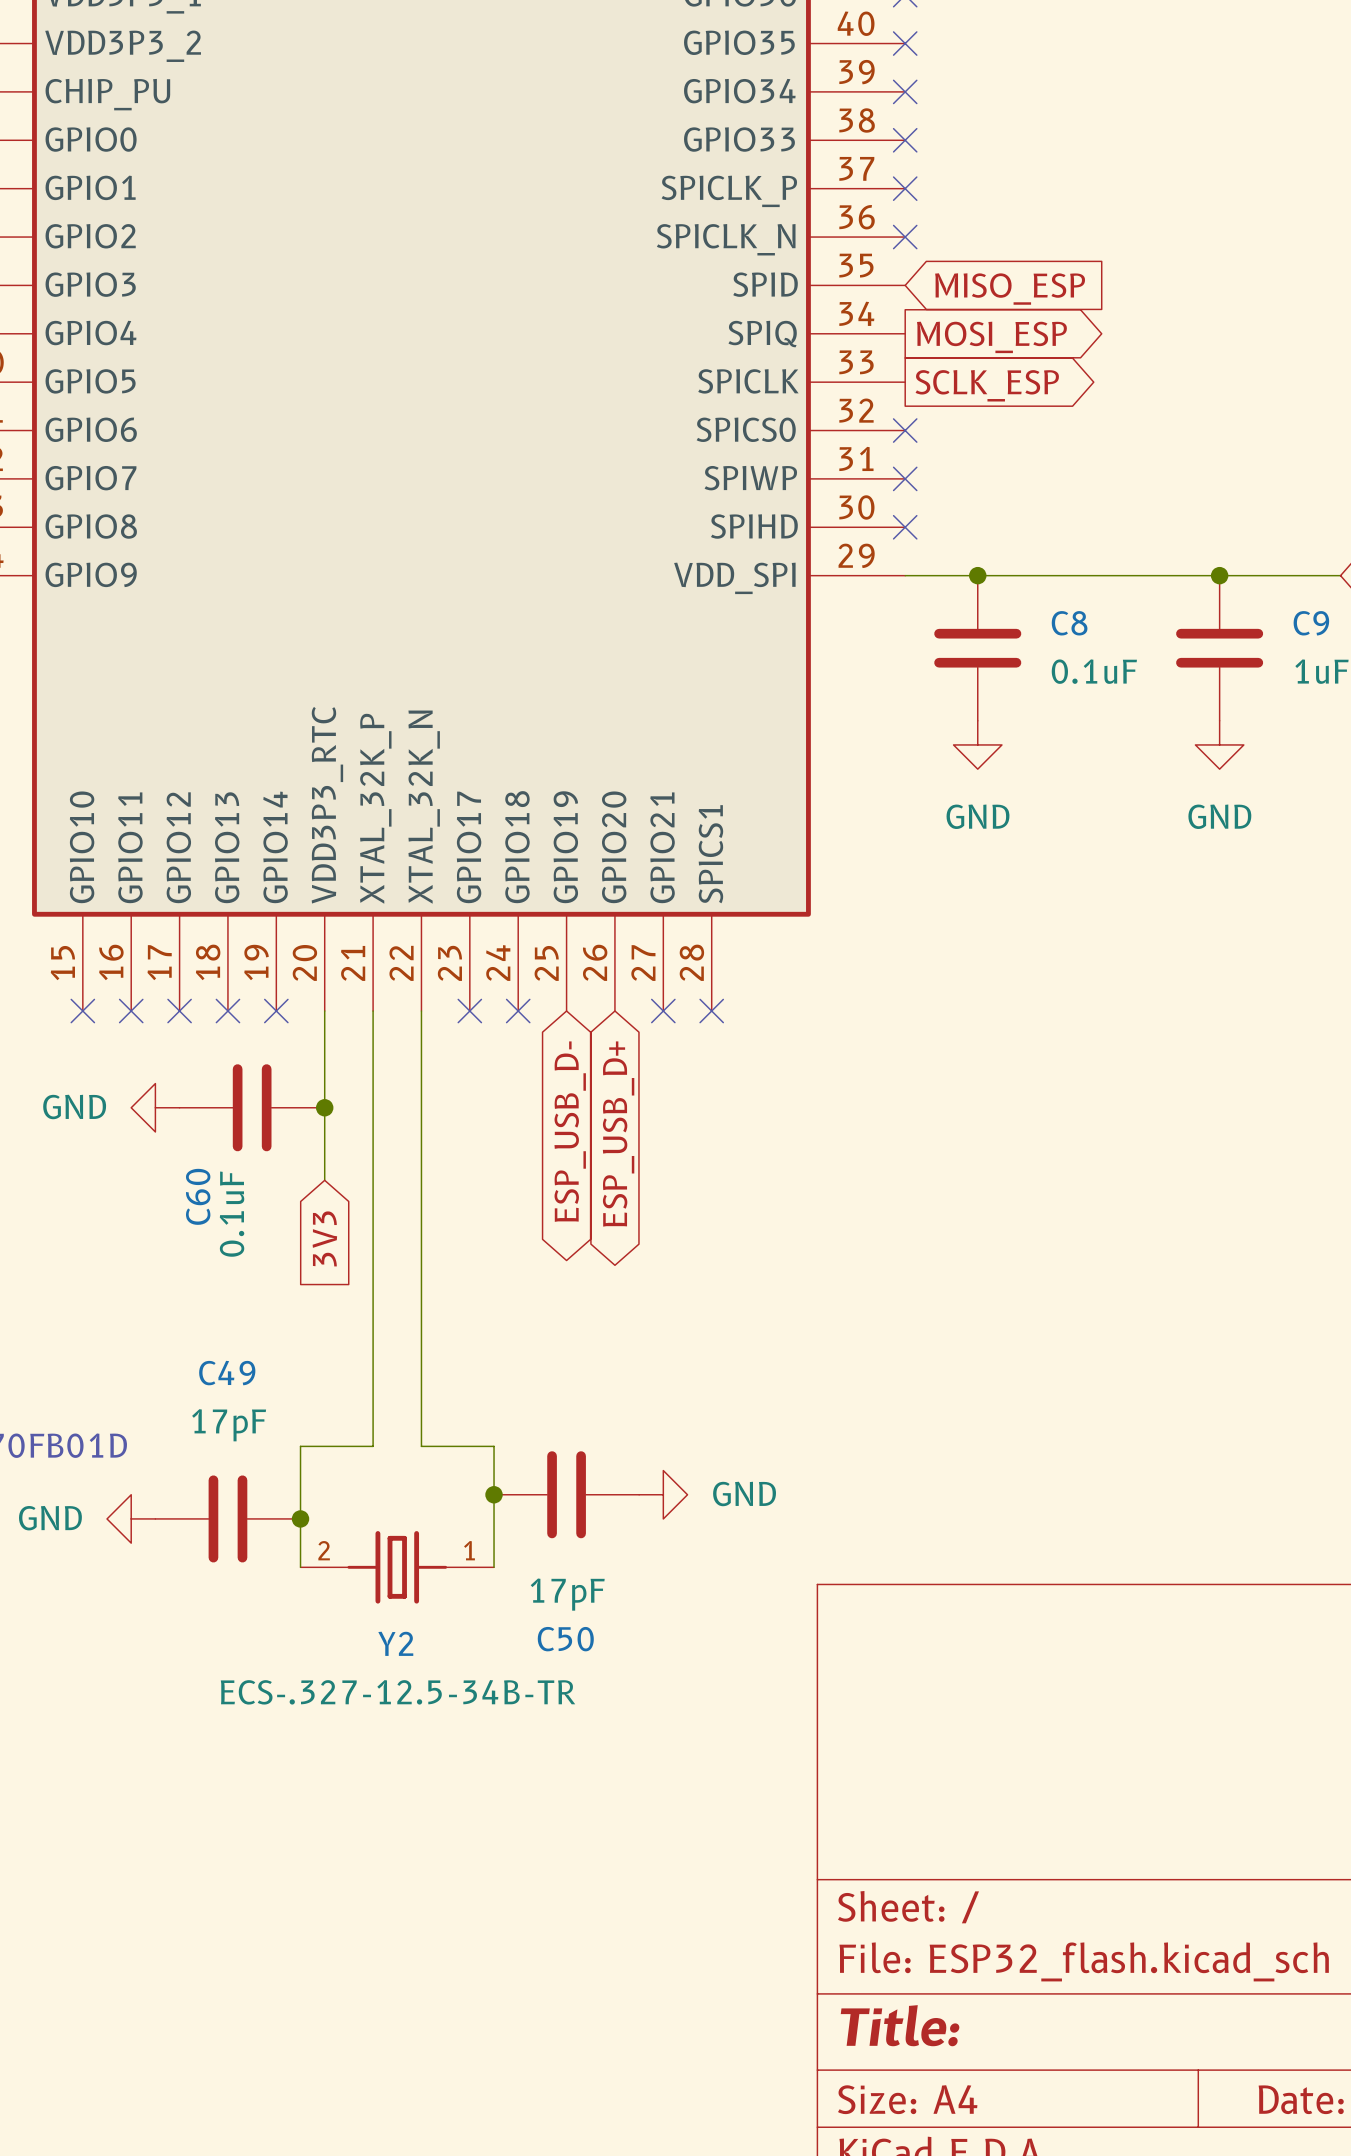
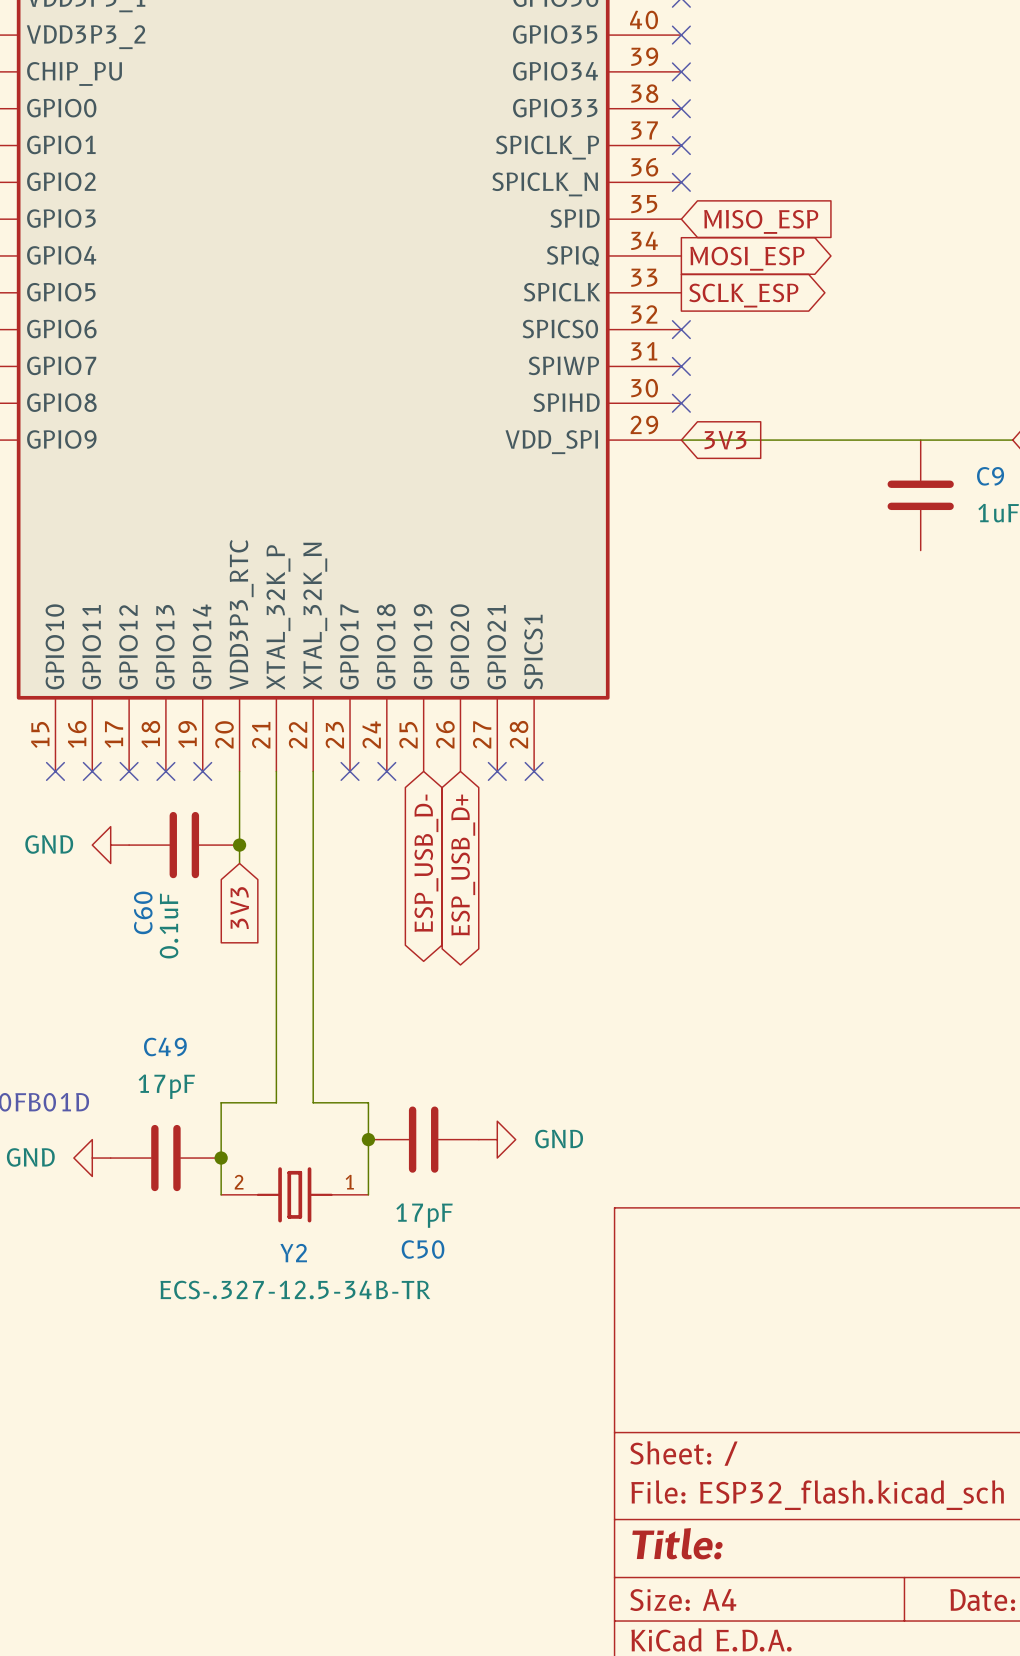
global label: none -> 3V3 (725, 440)
junction: (977, 575) -> none
junction: (1219, 575) -> none
C8: 0.1uF (977, 648) -> none
power symbol: GND (977, 744) -> none
power symbol: GND (1219, 744) -> none
wire: (324, 1131) (324, 1180) -> none
global label position: 3V3 (324, 1238) -> 3V3 (239, 908)

